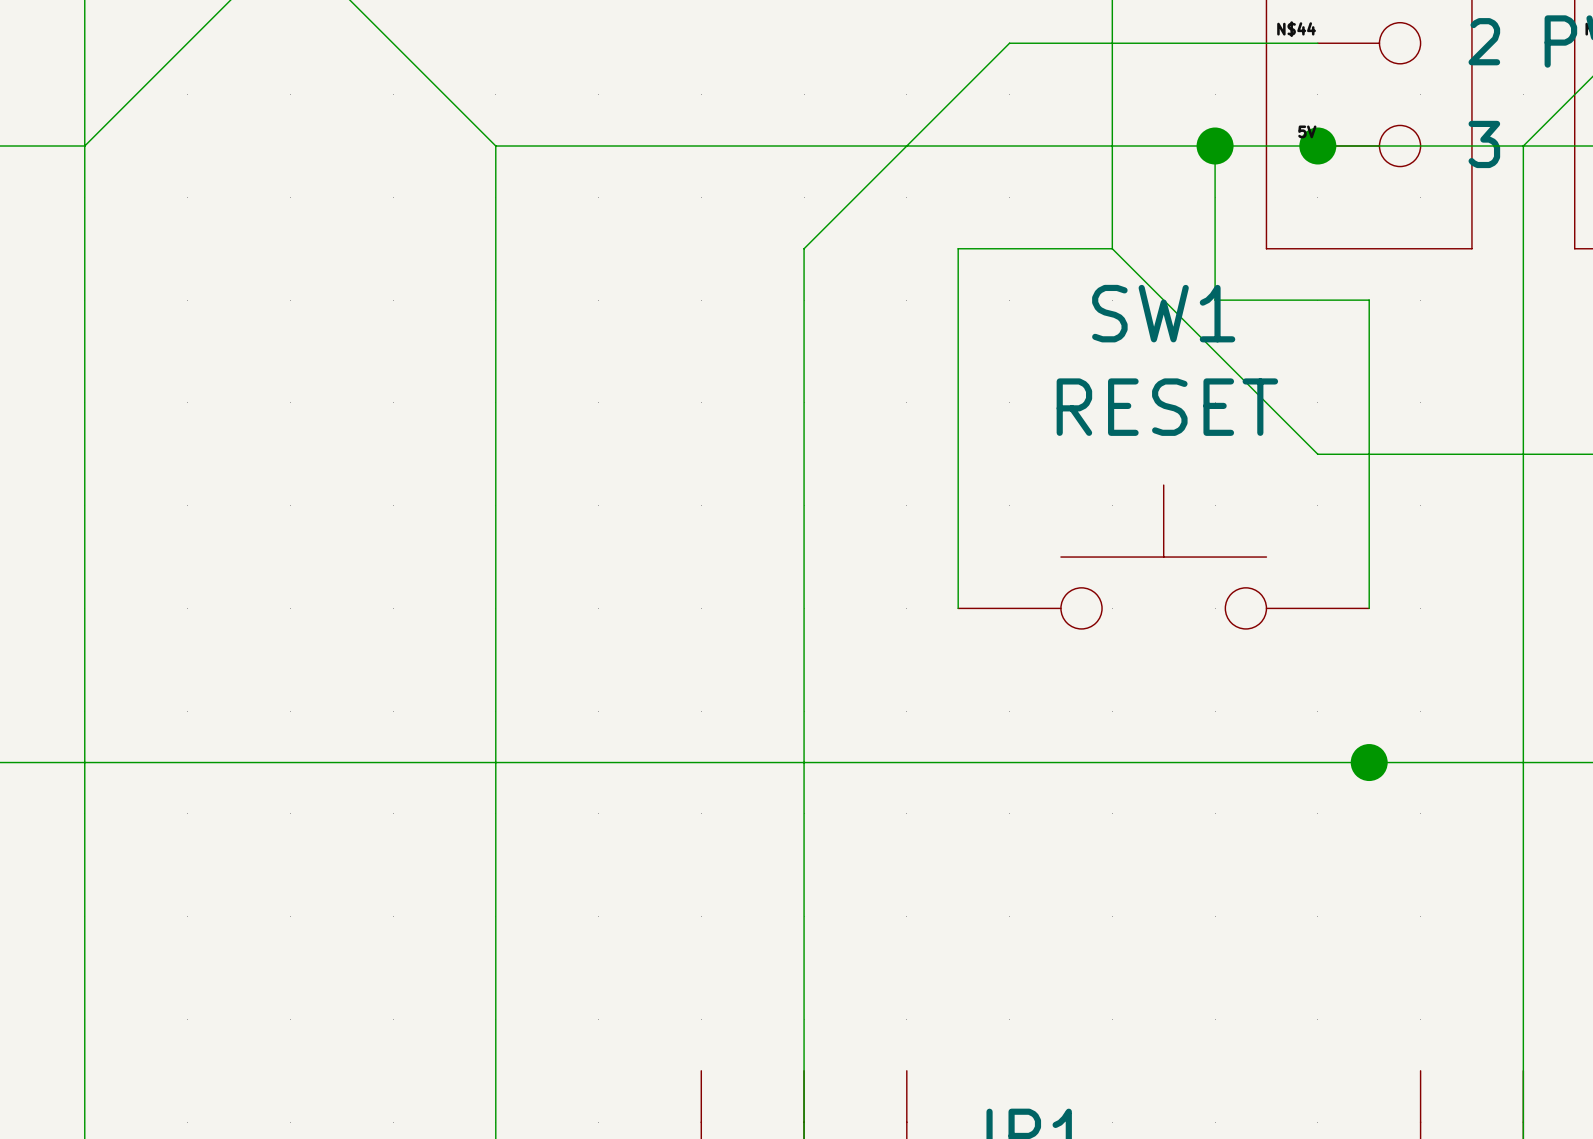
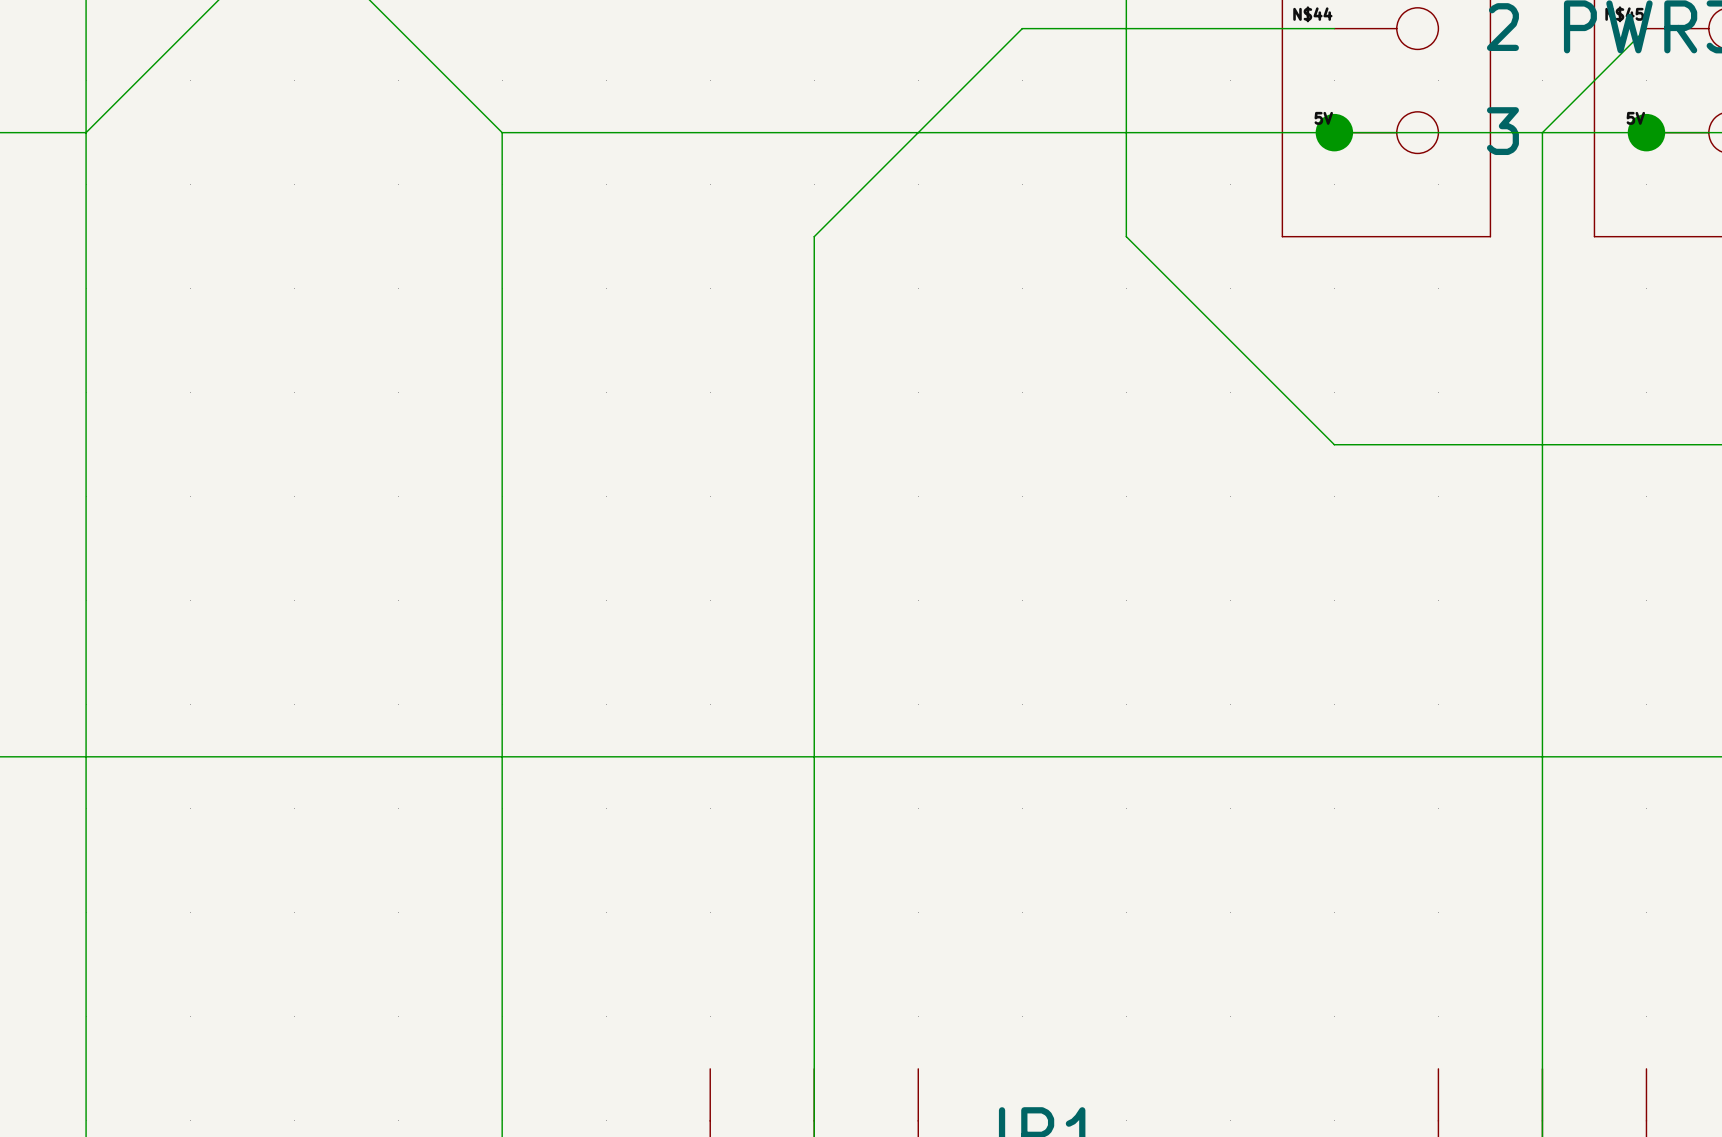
wire: (1215, 146) (1215, 300) (1369, 300) (1369, 608) -> none
junction: (1215, 146) -> none
wire: (1112, 248) (958, 248) (958, 608) -> none
SW1: RESET (1163, 557) -> none
junction: (1369, 762) -> none

